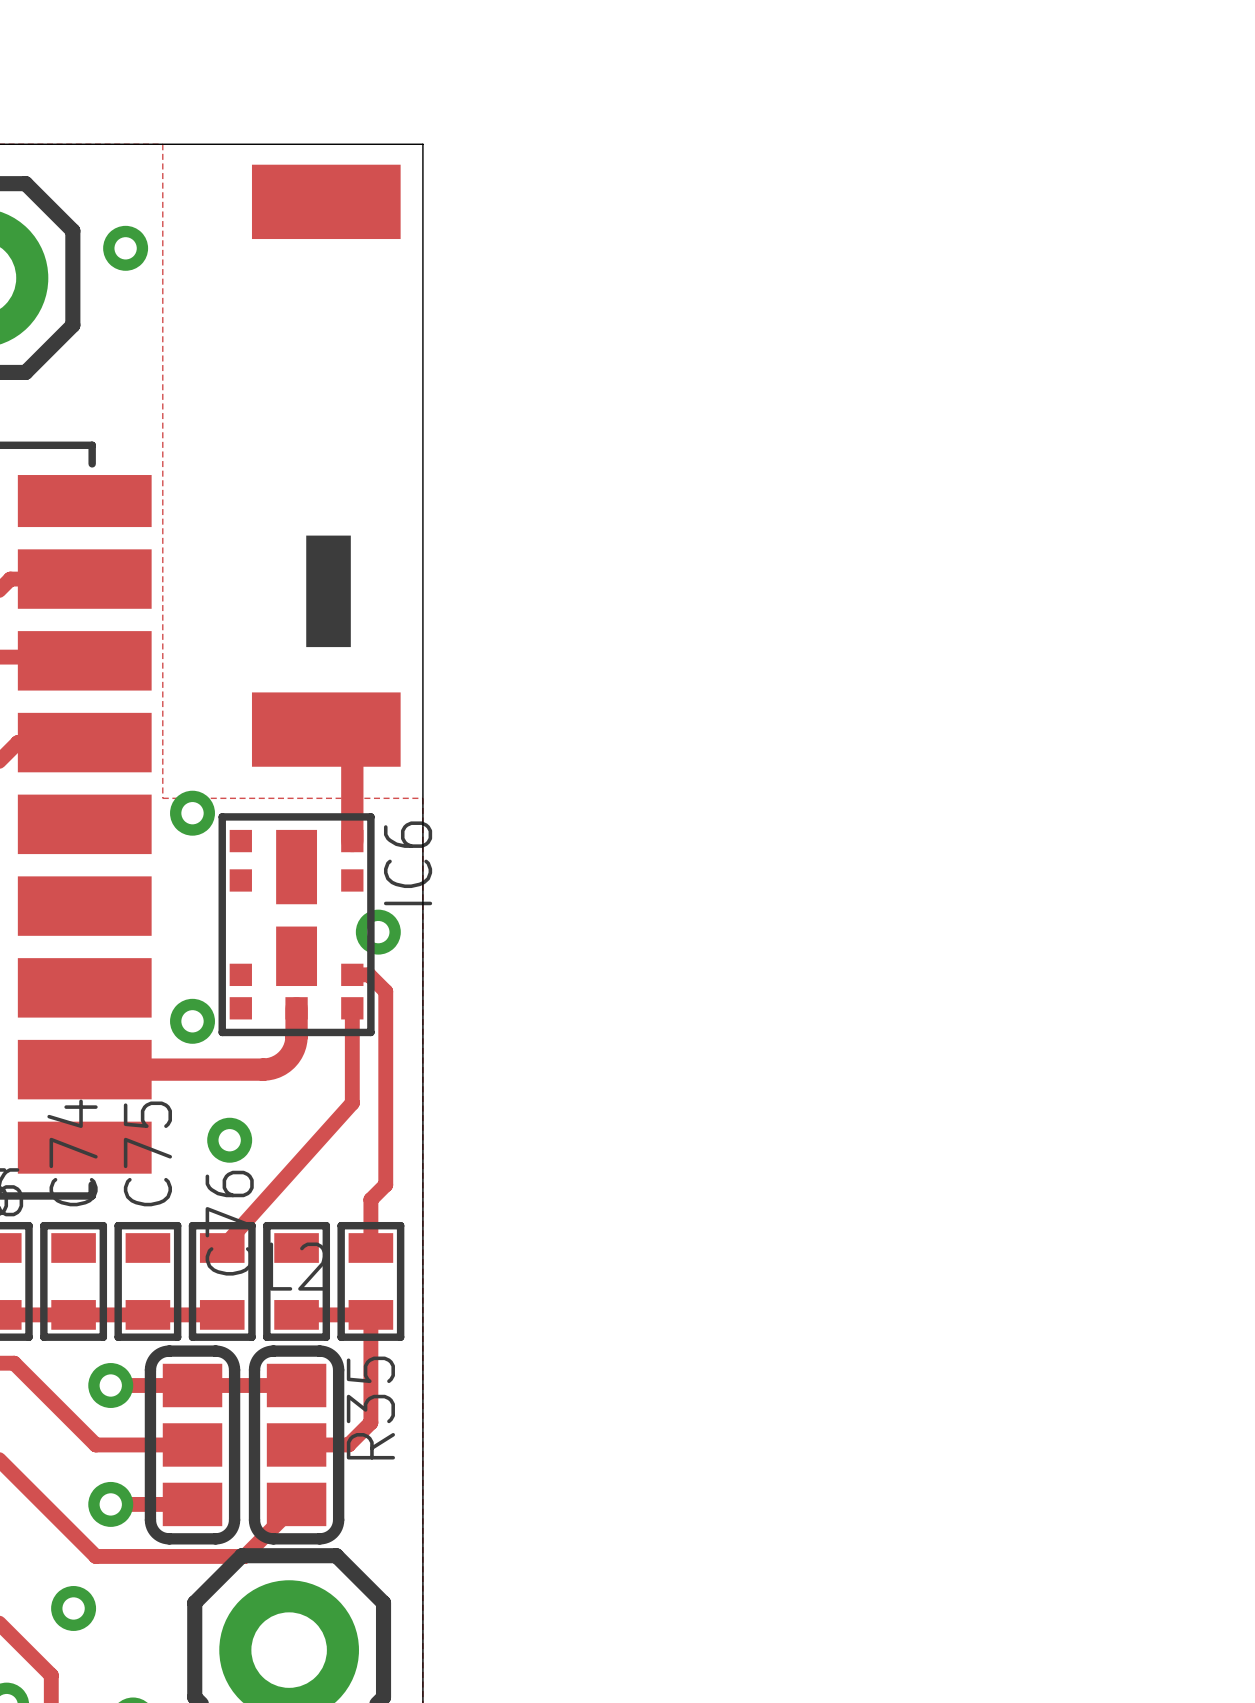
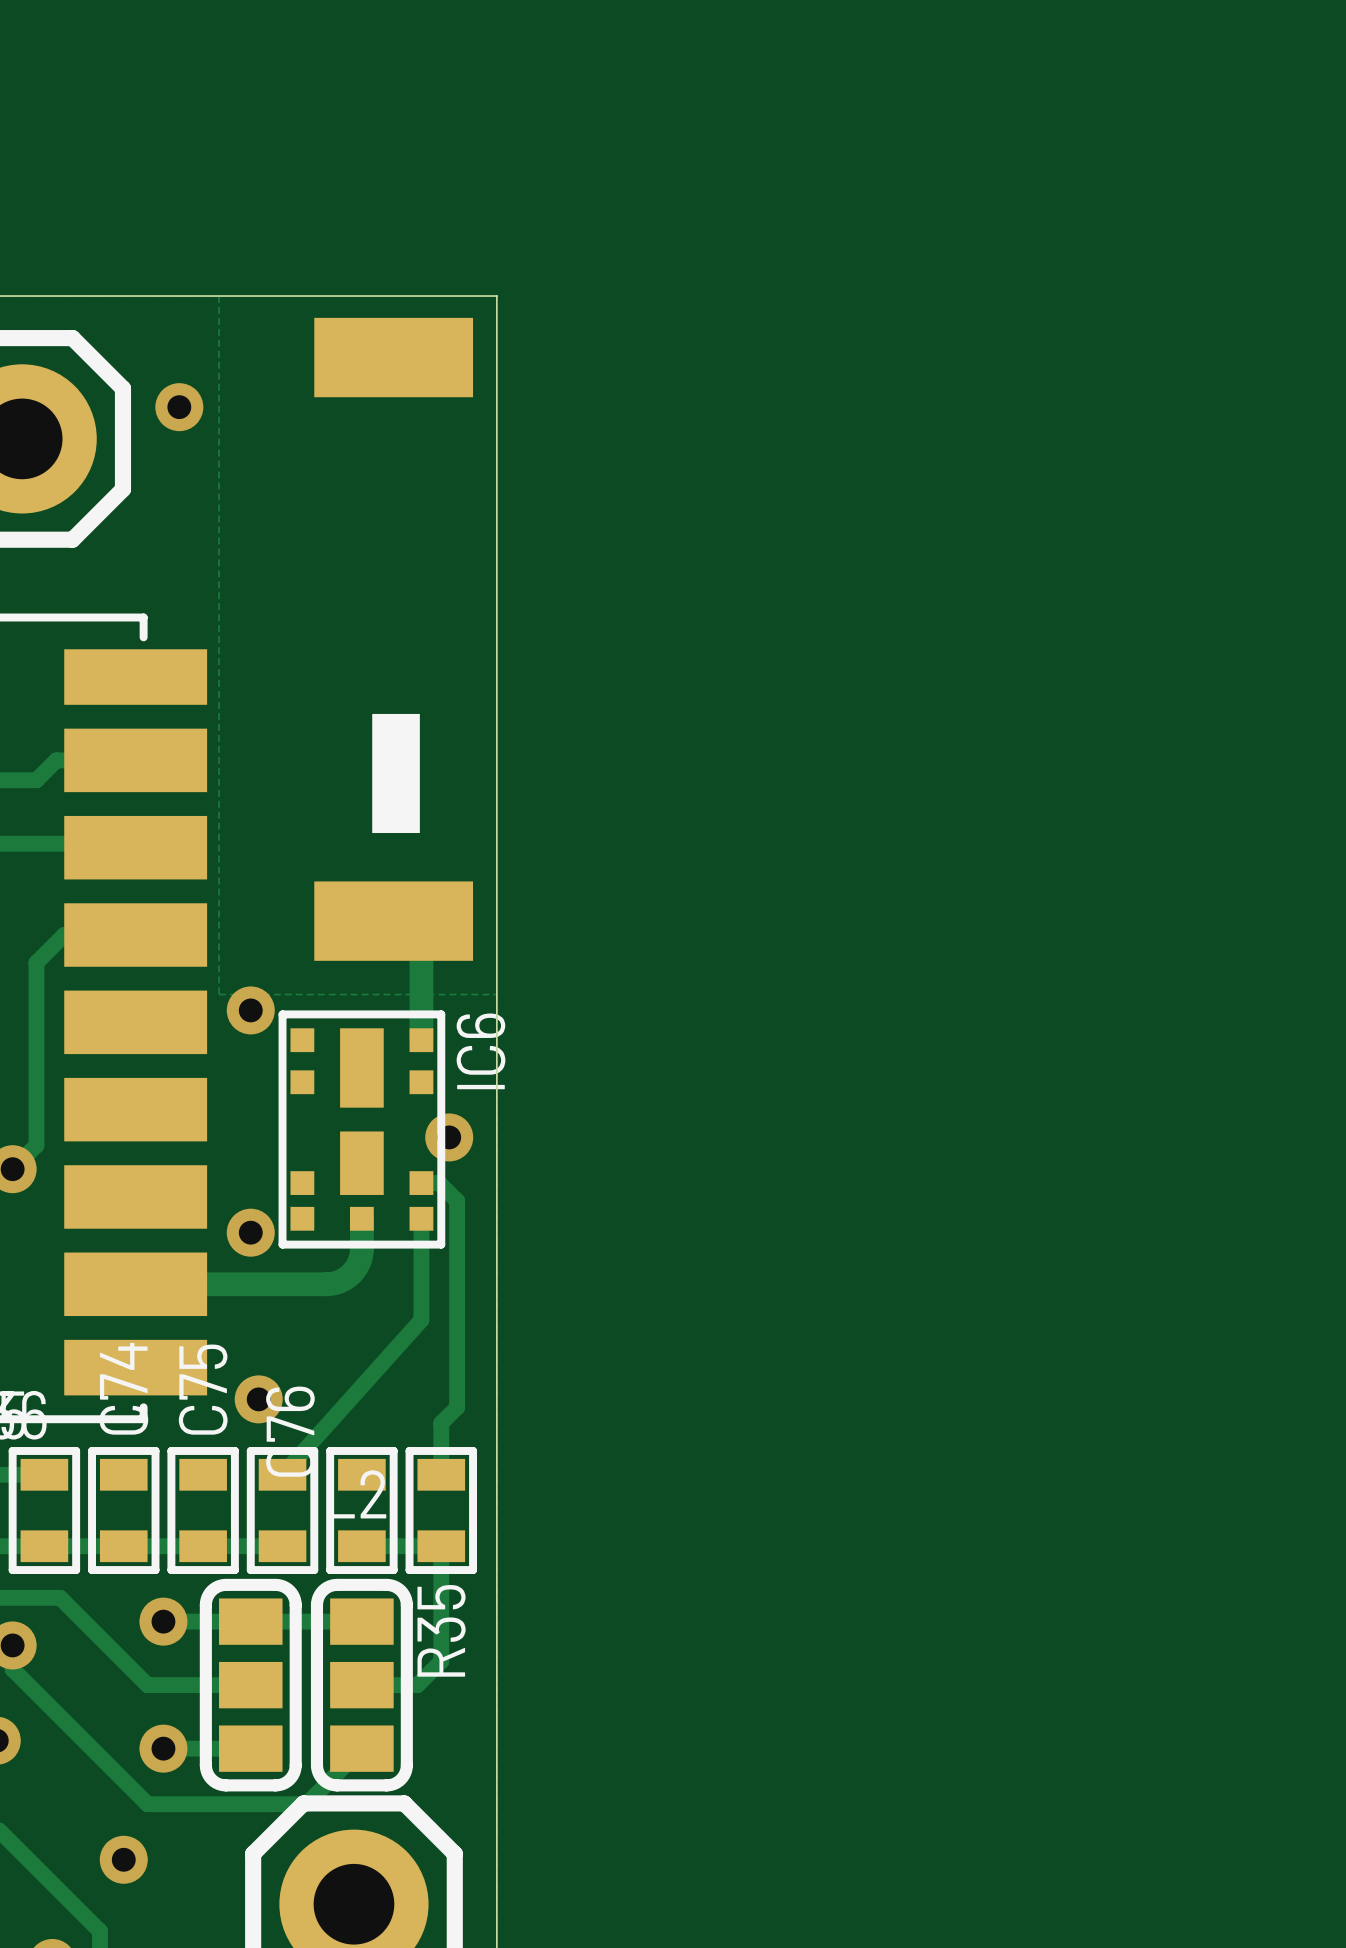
via position: (229, 1140) -> (258, 1399)

